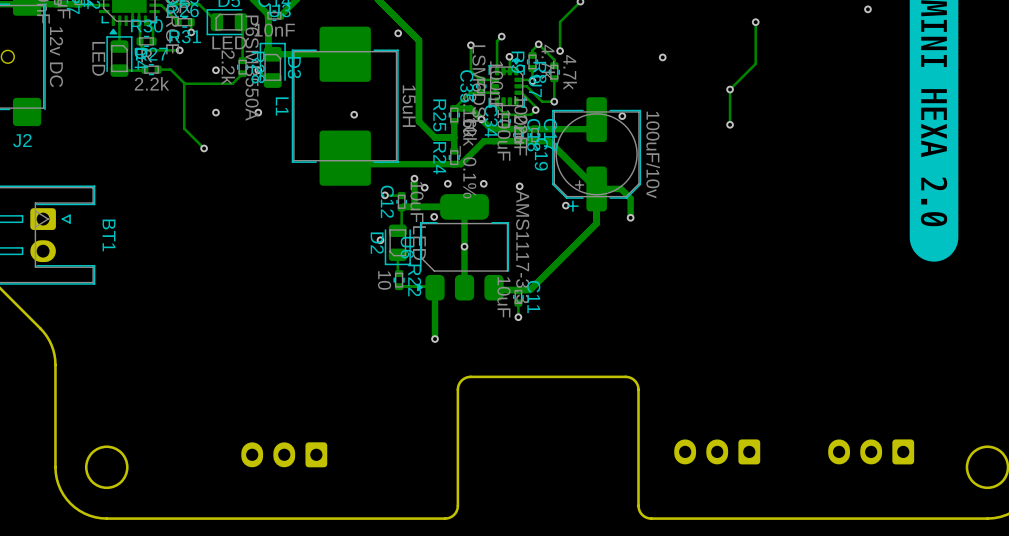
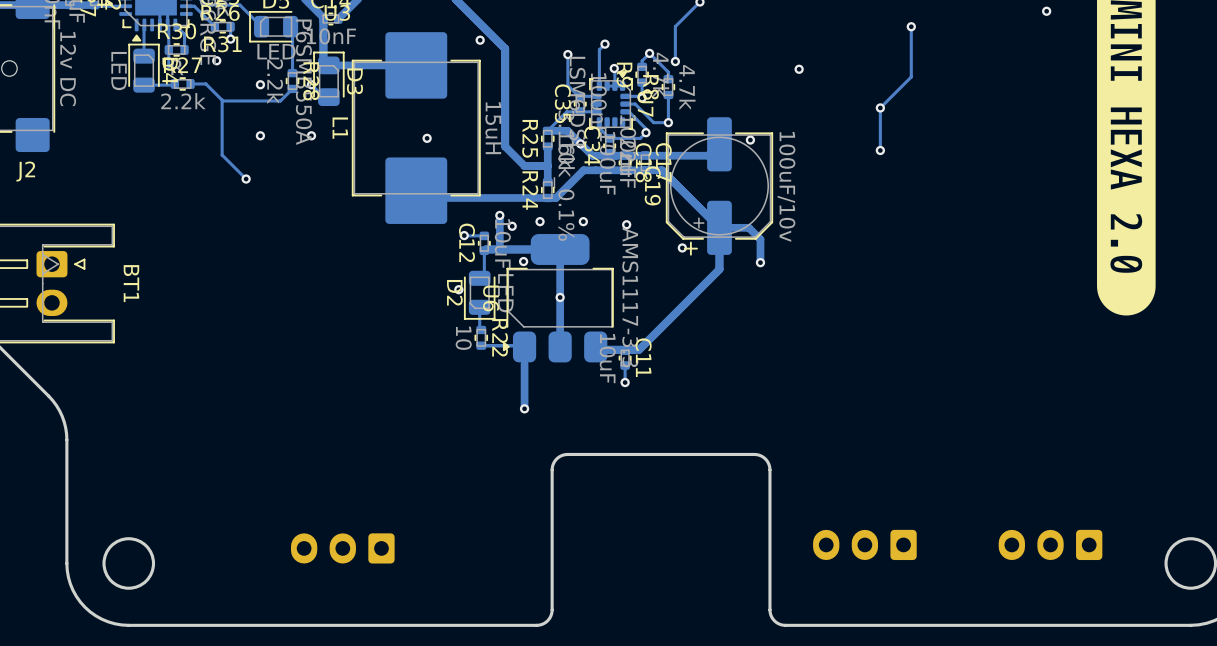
track: (139, 44) (145, 50) (179, 50) -> (168, 53) (168, 66)

